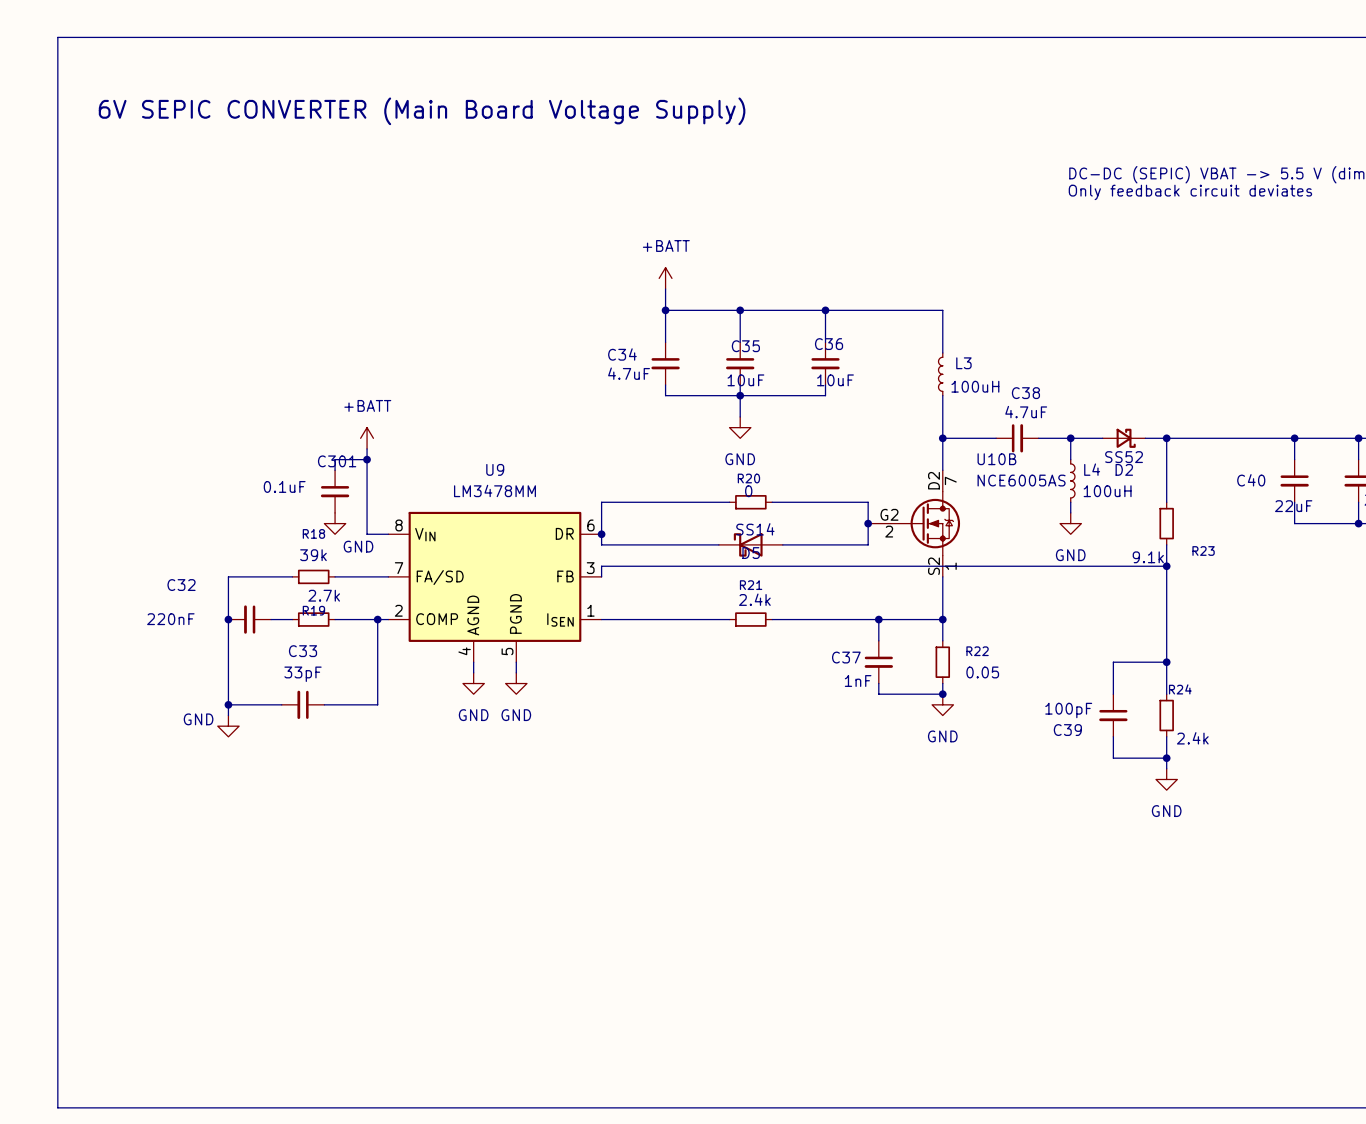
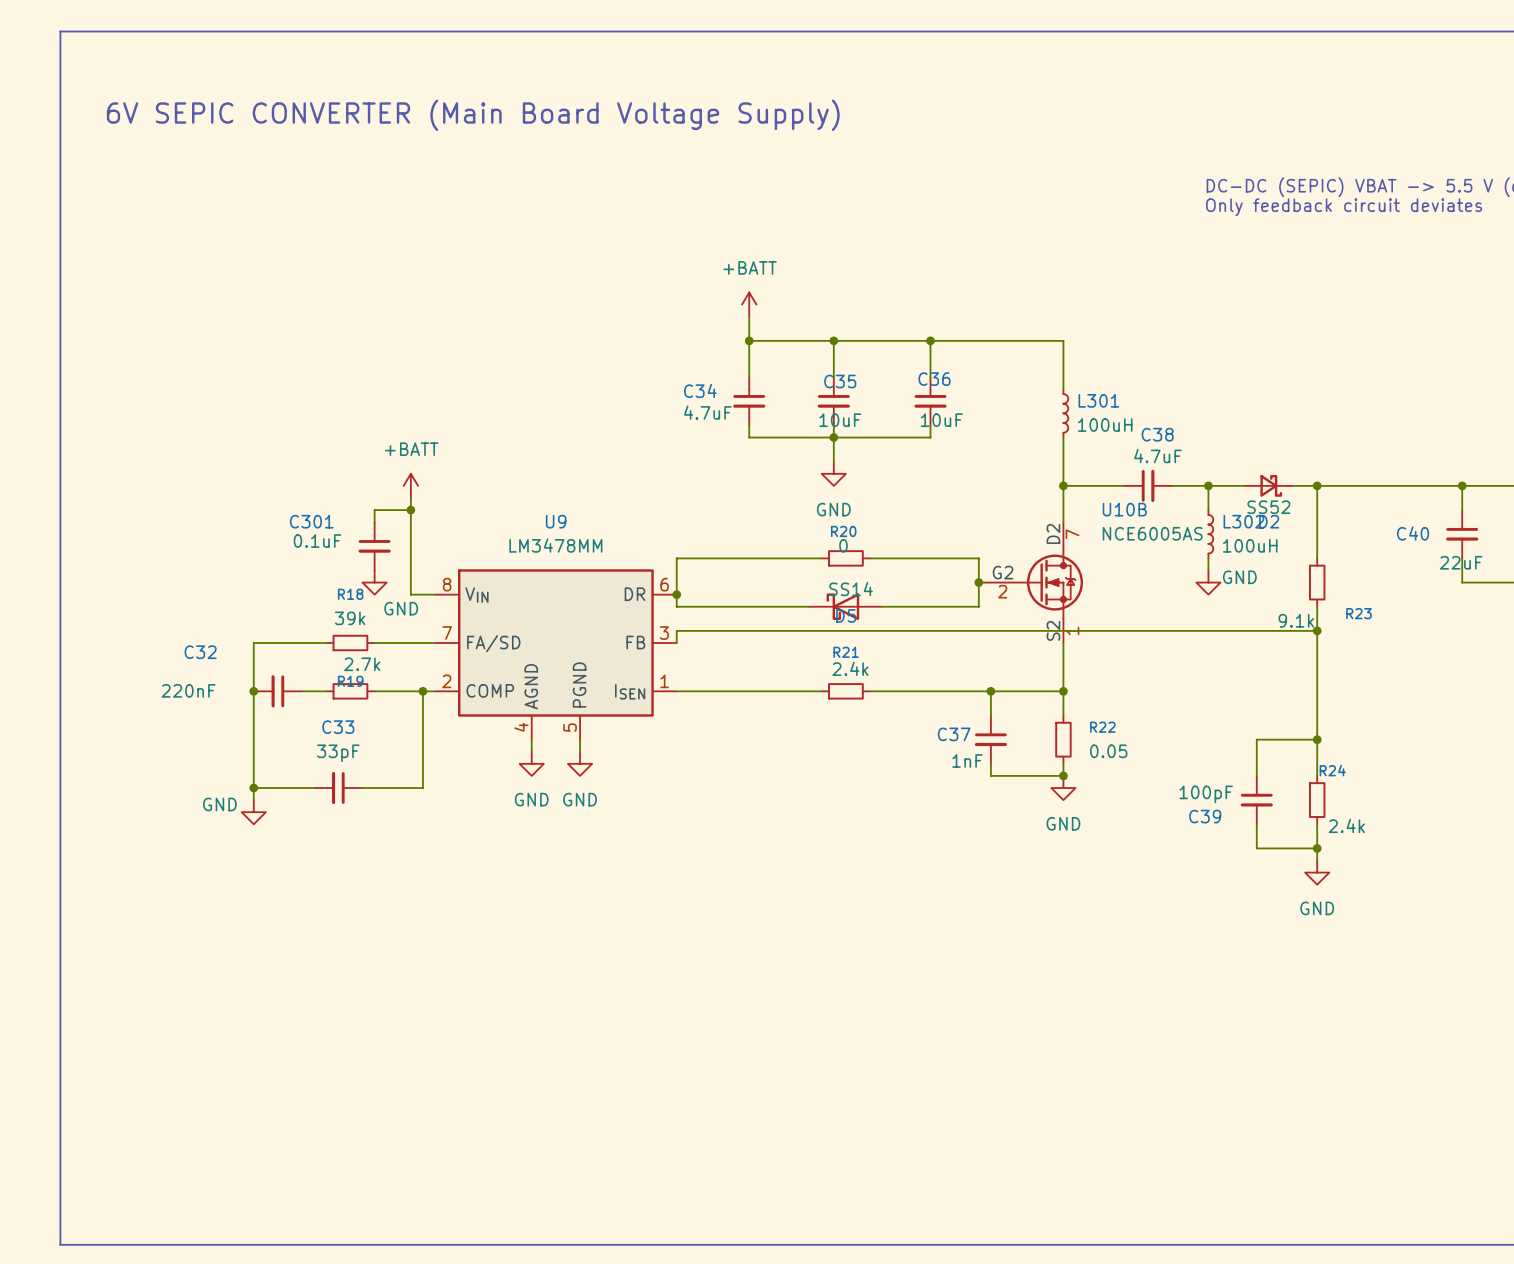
L3: 100uH (940, 374) -> none
L301: none -> 100uH (1065, 413)
C301 name position: C301 (337, 461) -> C301 (311, 521)
L4 name: L4 (1092, 469) -> L302 (1243, 521)
power symbol text position: GND (1070, 555) -> GND (1239, 577)

